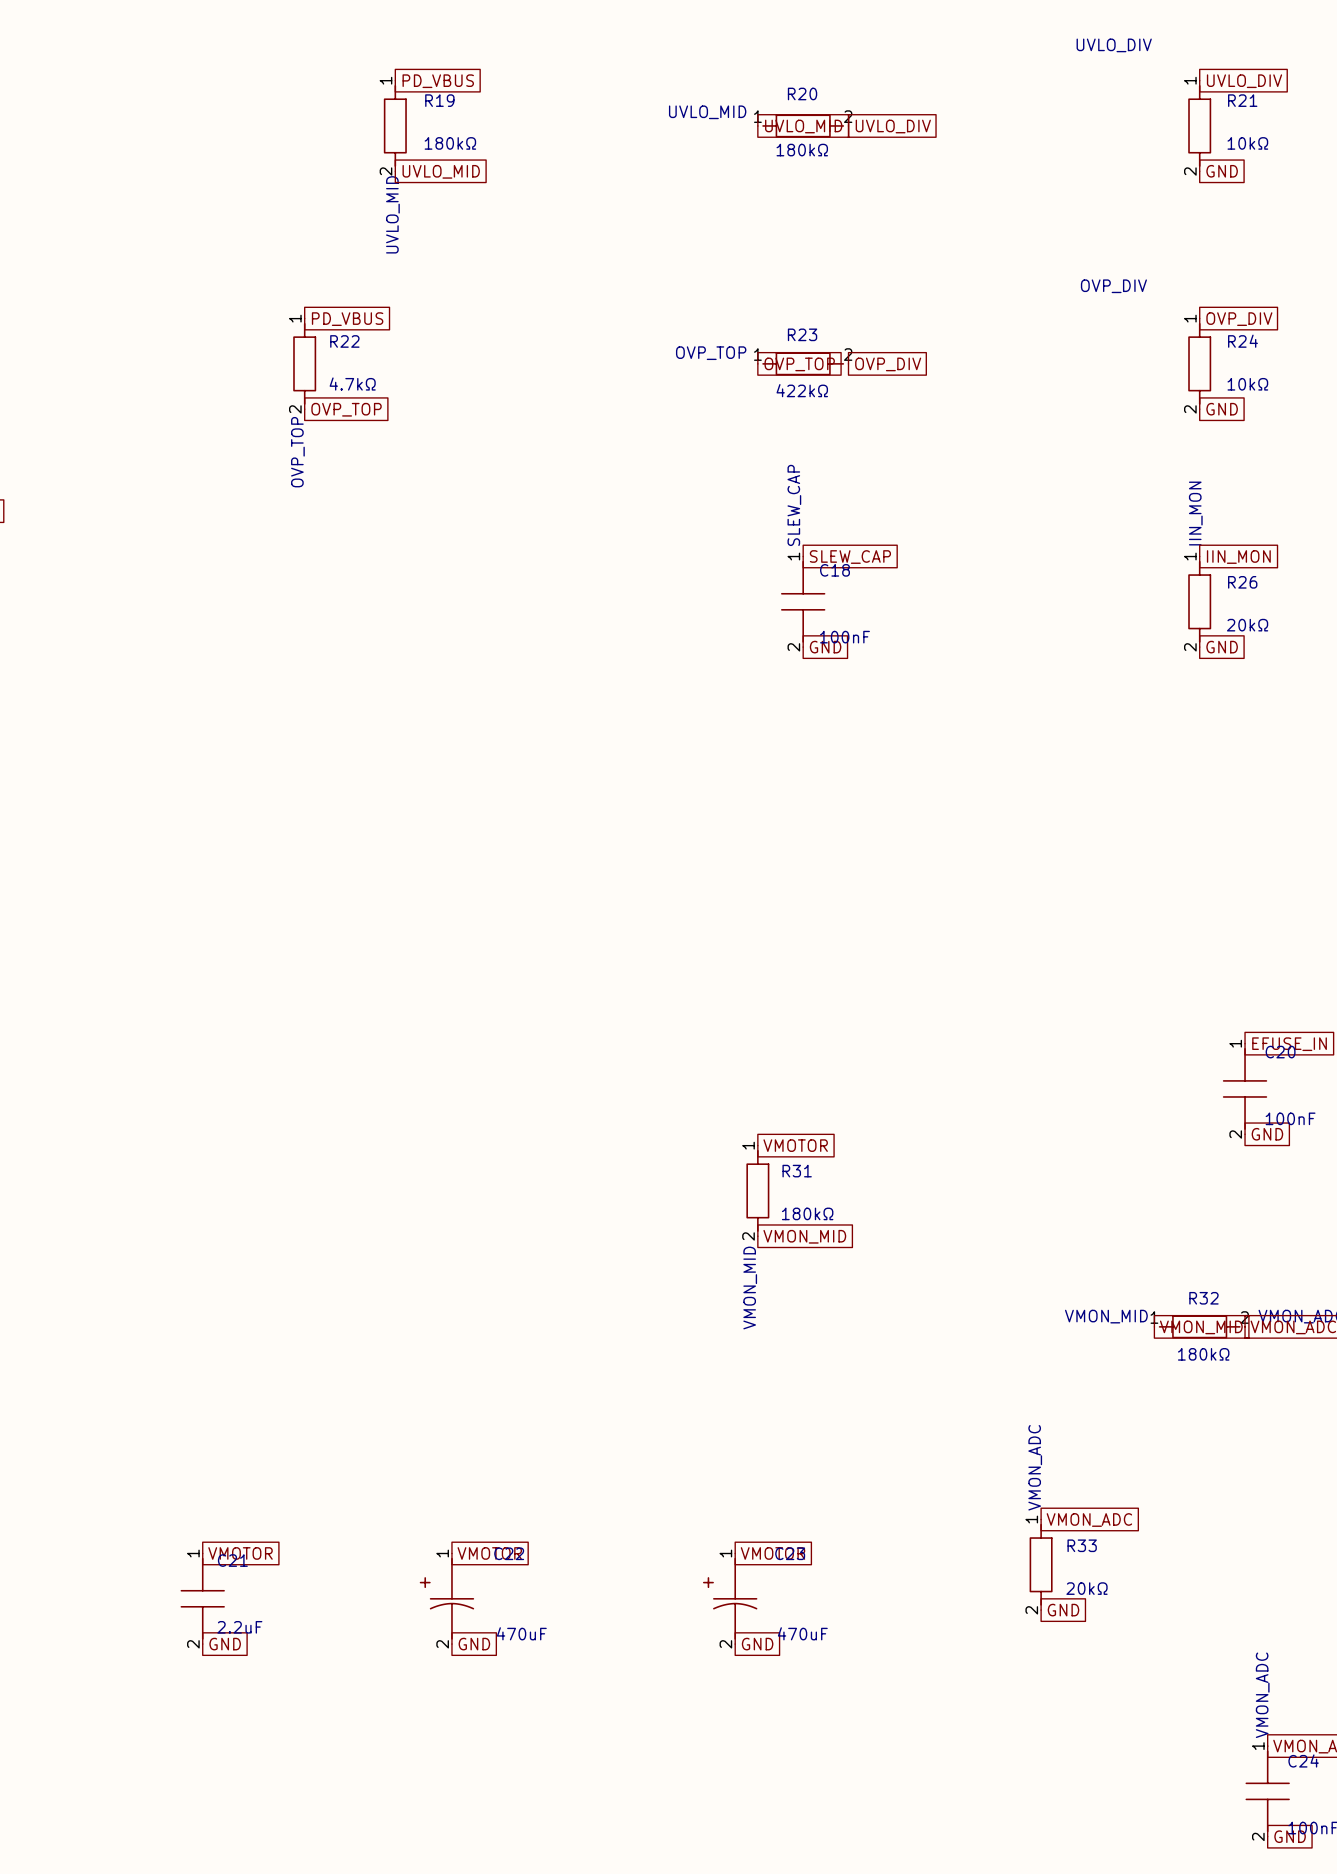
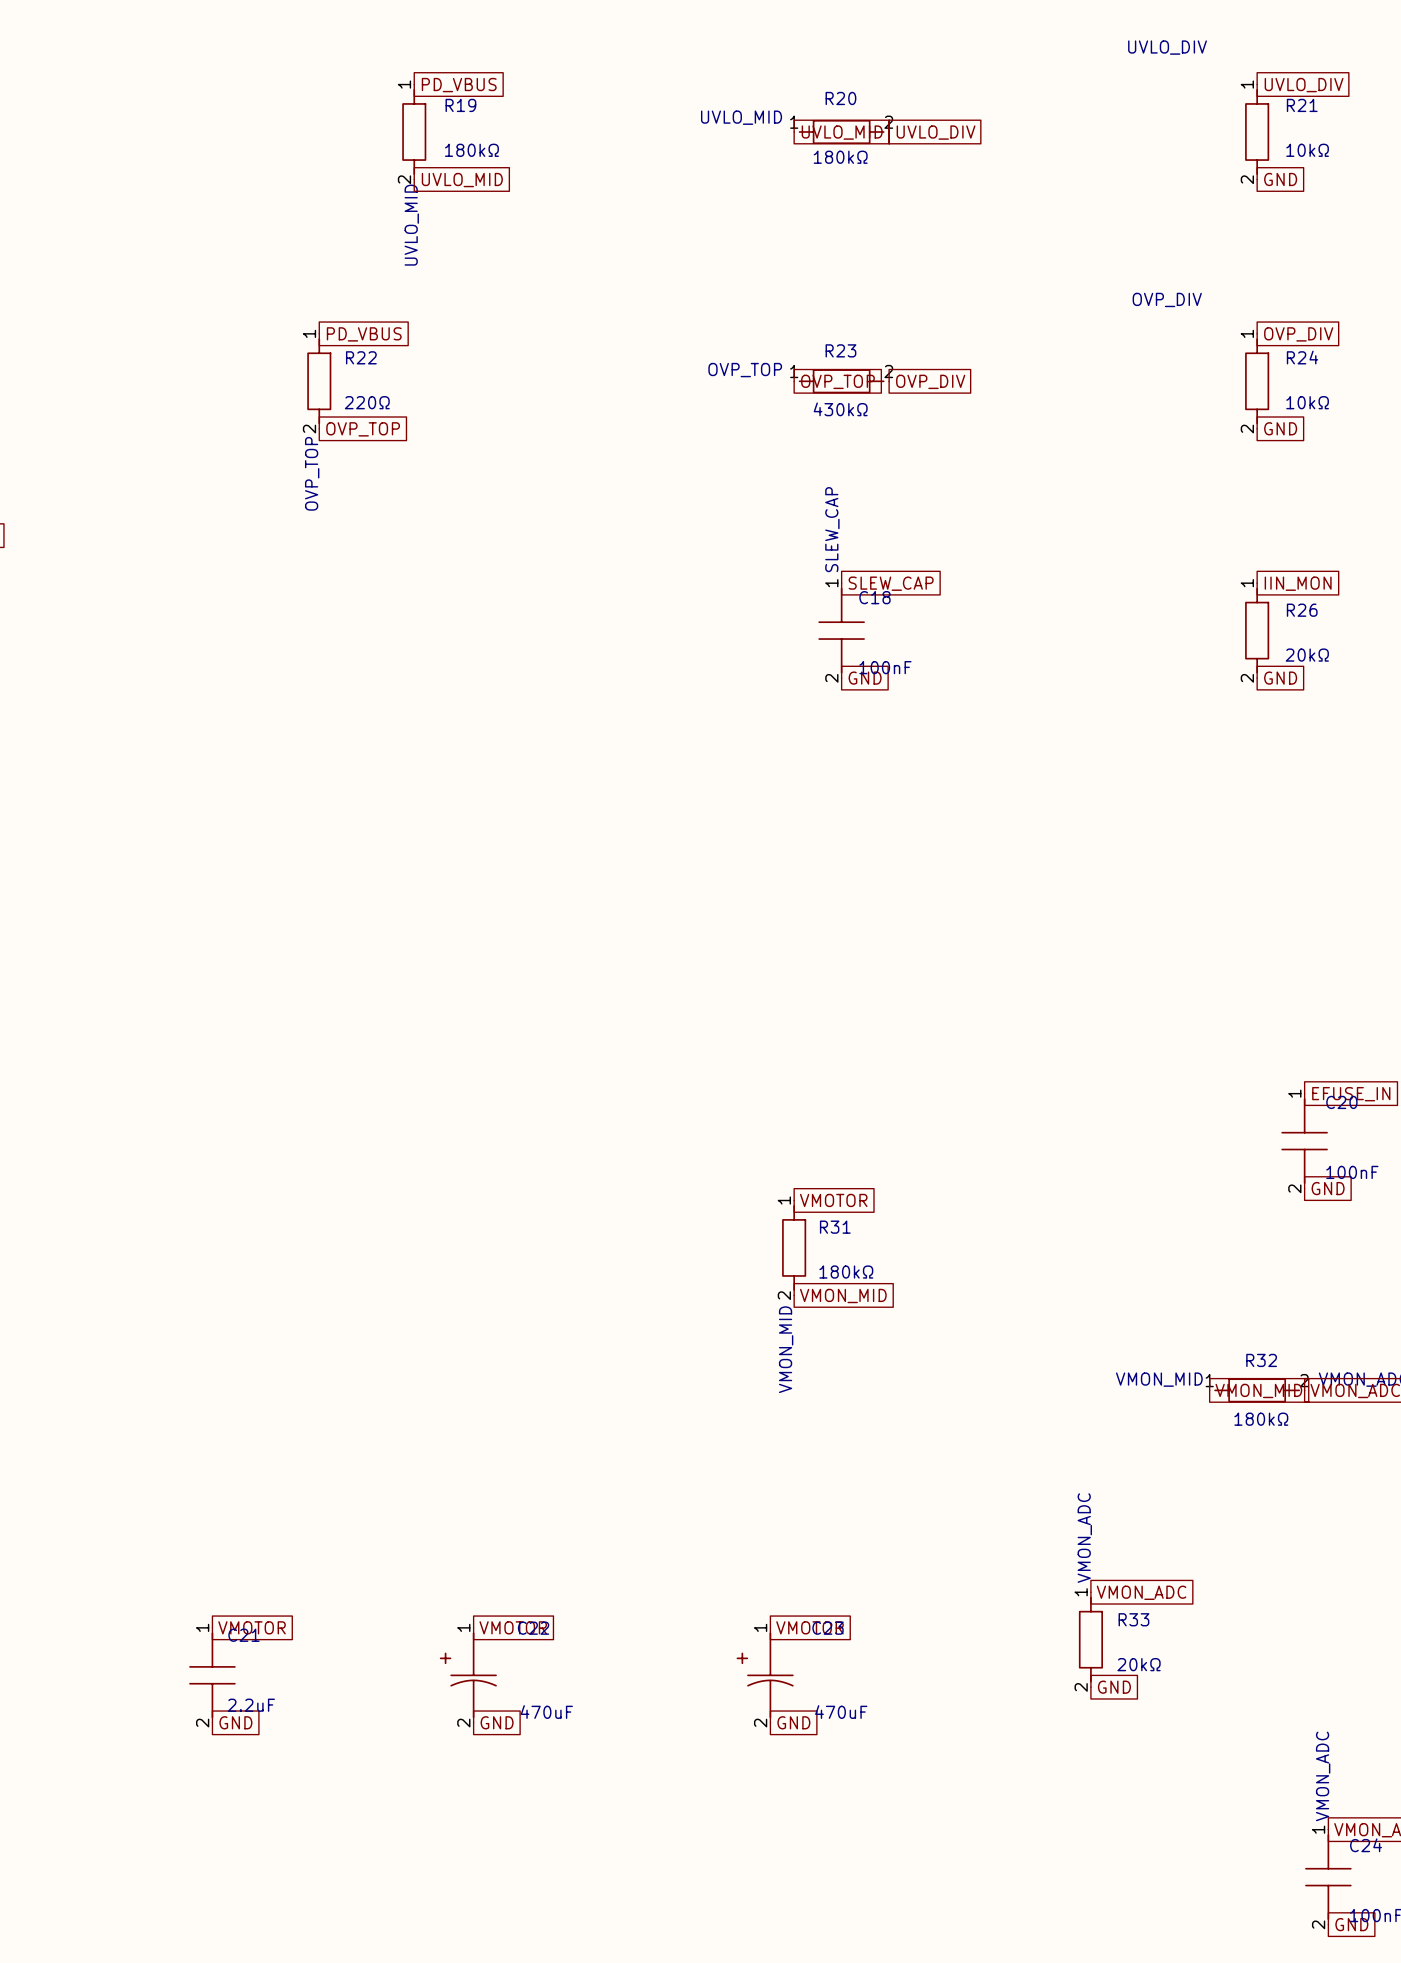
R22 value: 4.7kΩ (352, 384) -> 220Ω (367, 402)
R23 value: 422kΩ (802, 390) -> 430kΩ (840, 409)
text: IIN_MON (1195, 513) -> none

